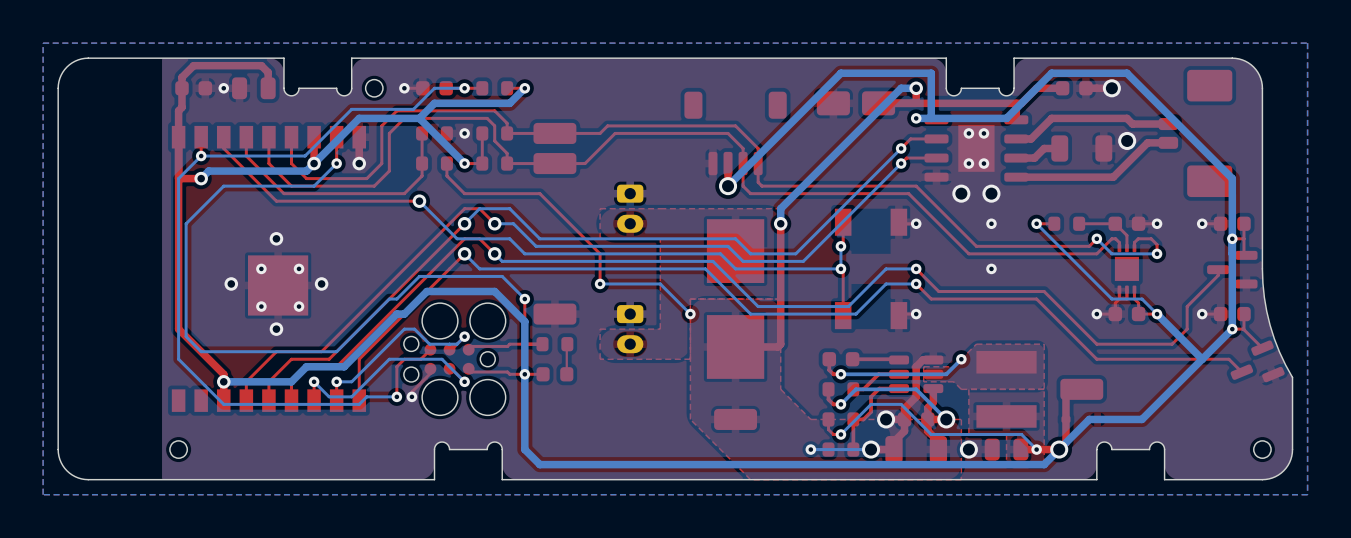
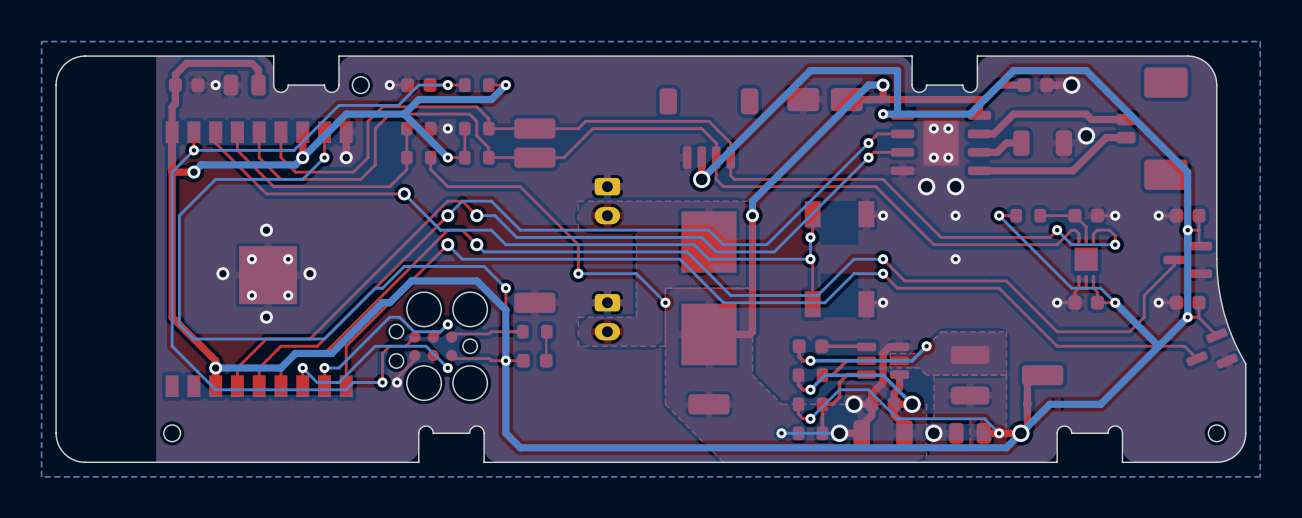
part footprint: [976, 350, 1037, 428] -> [950, 345, 990, 405]

